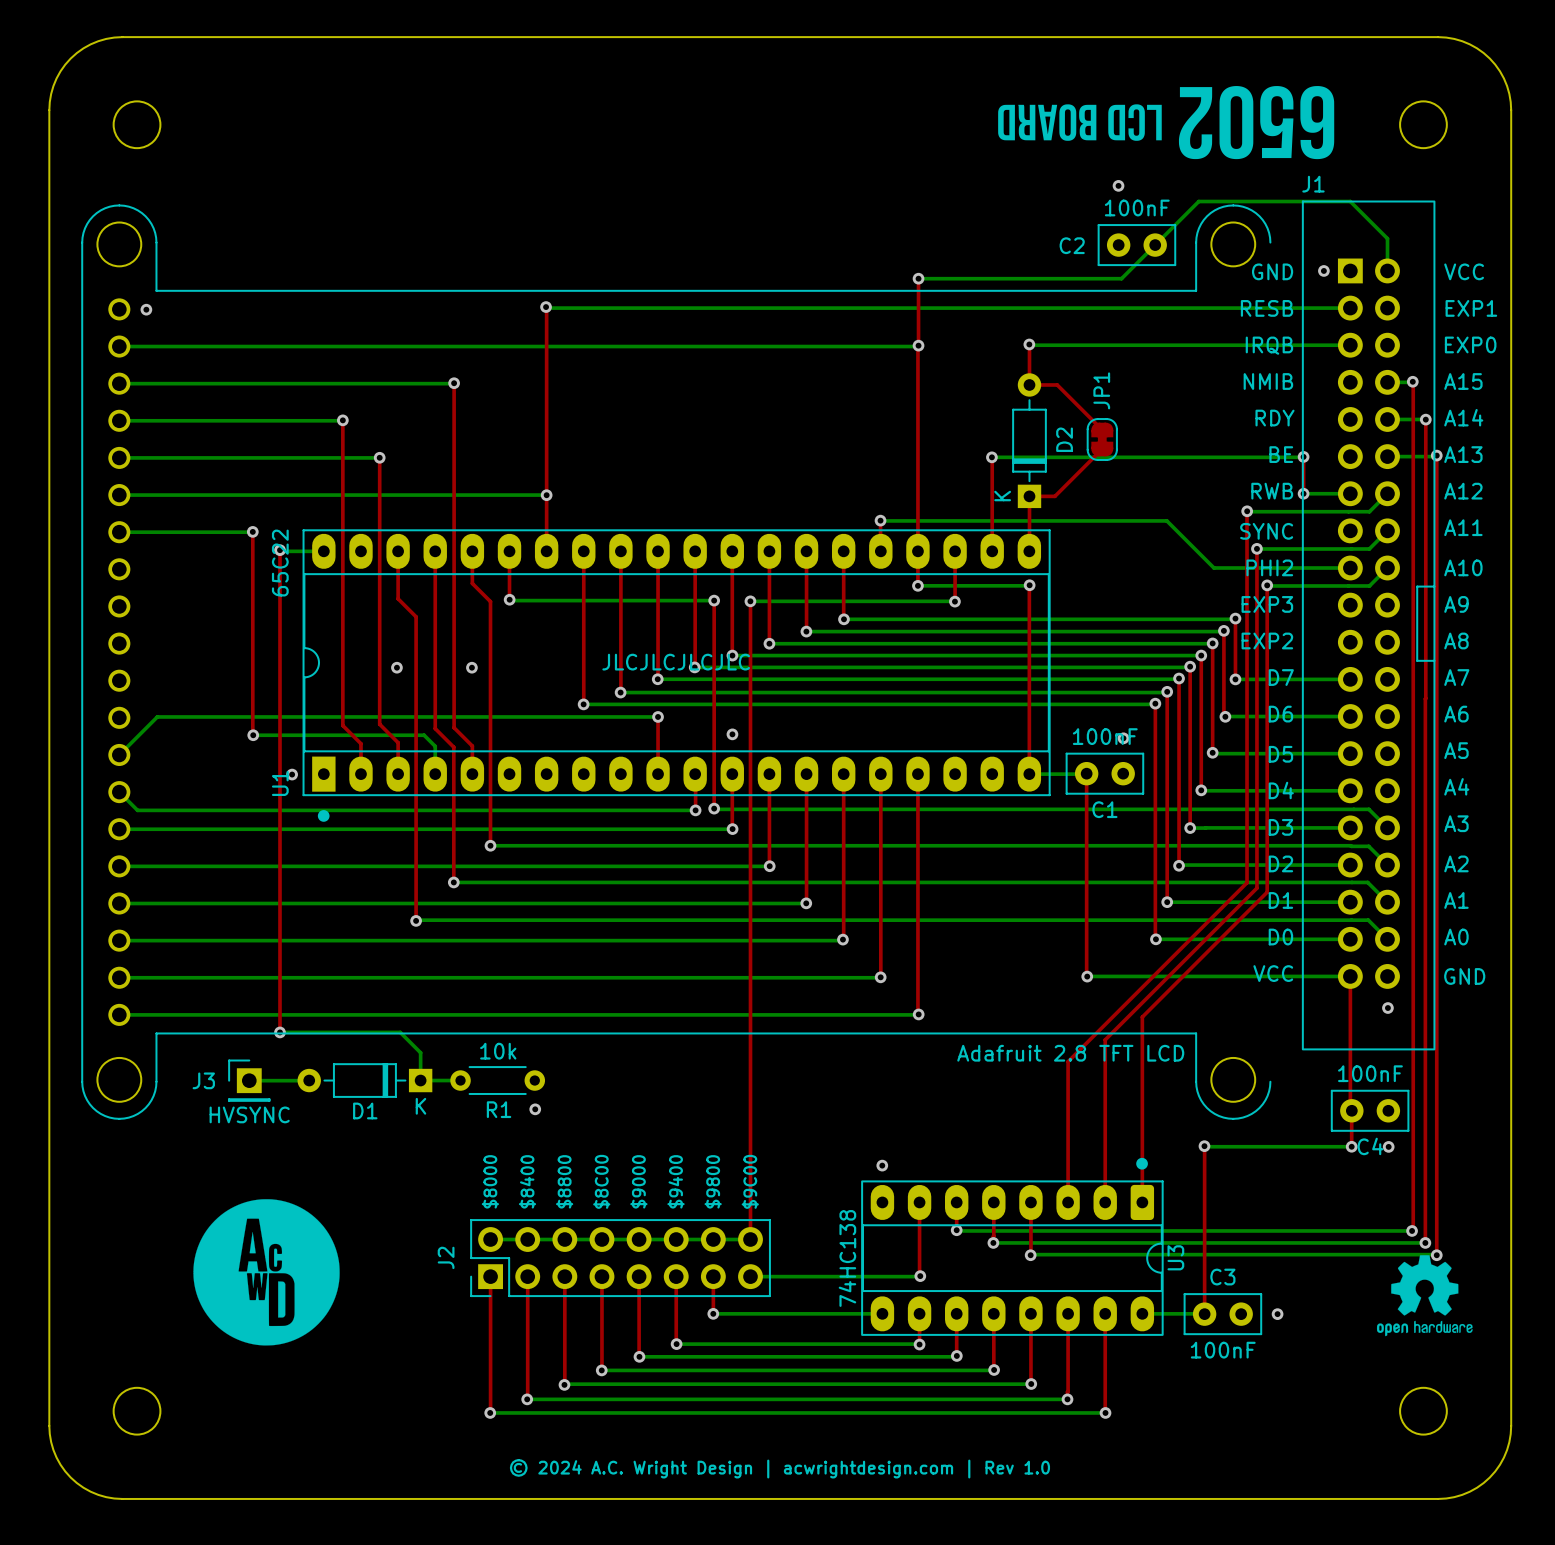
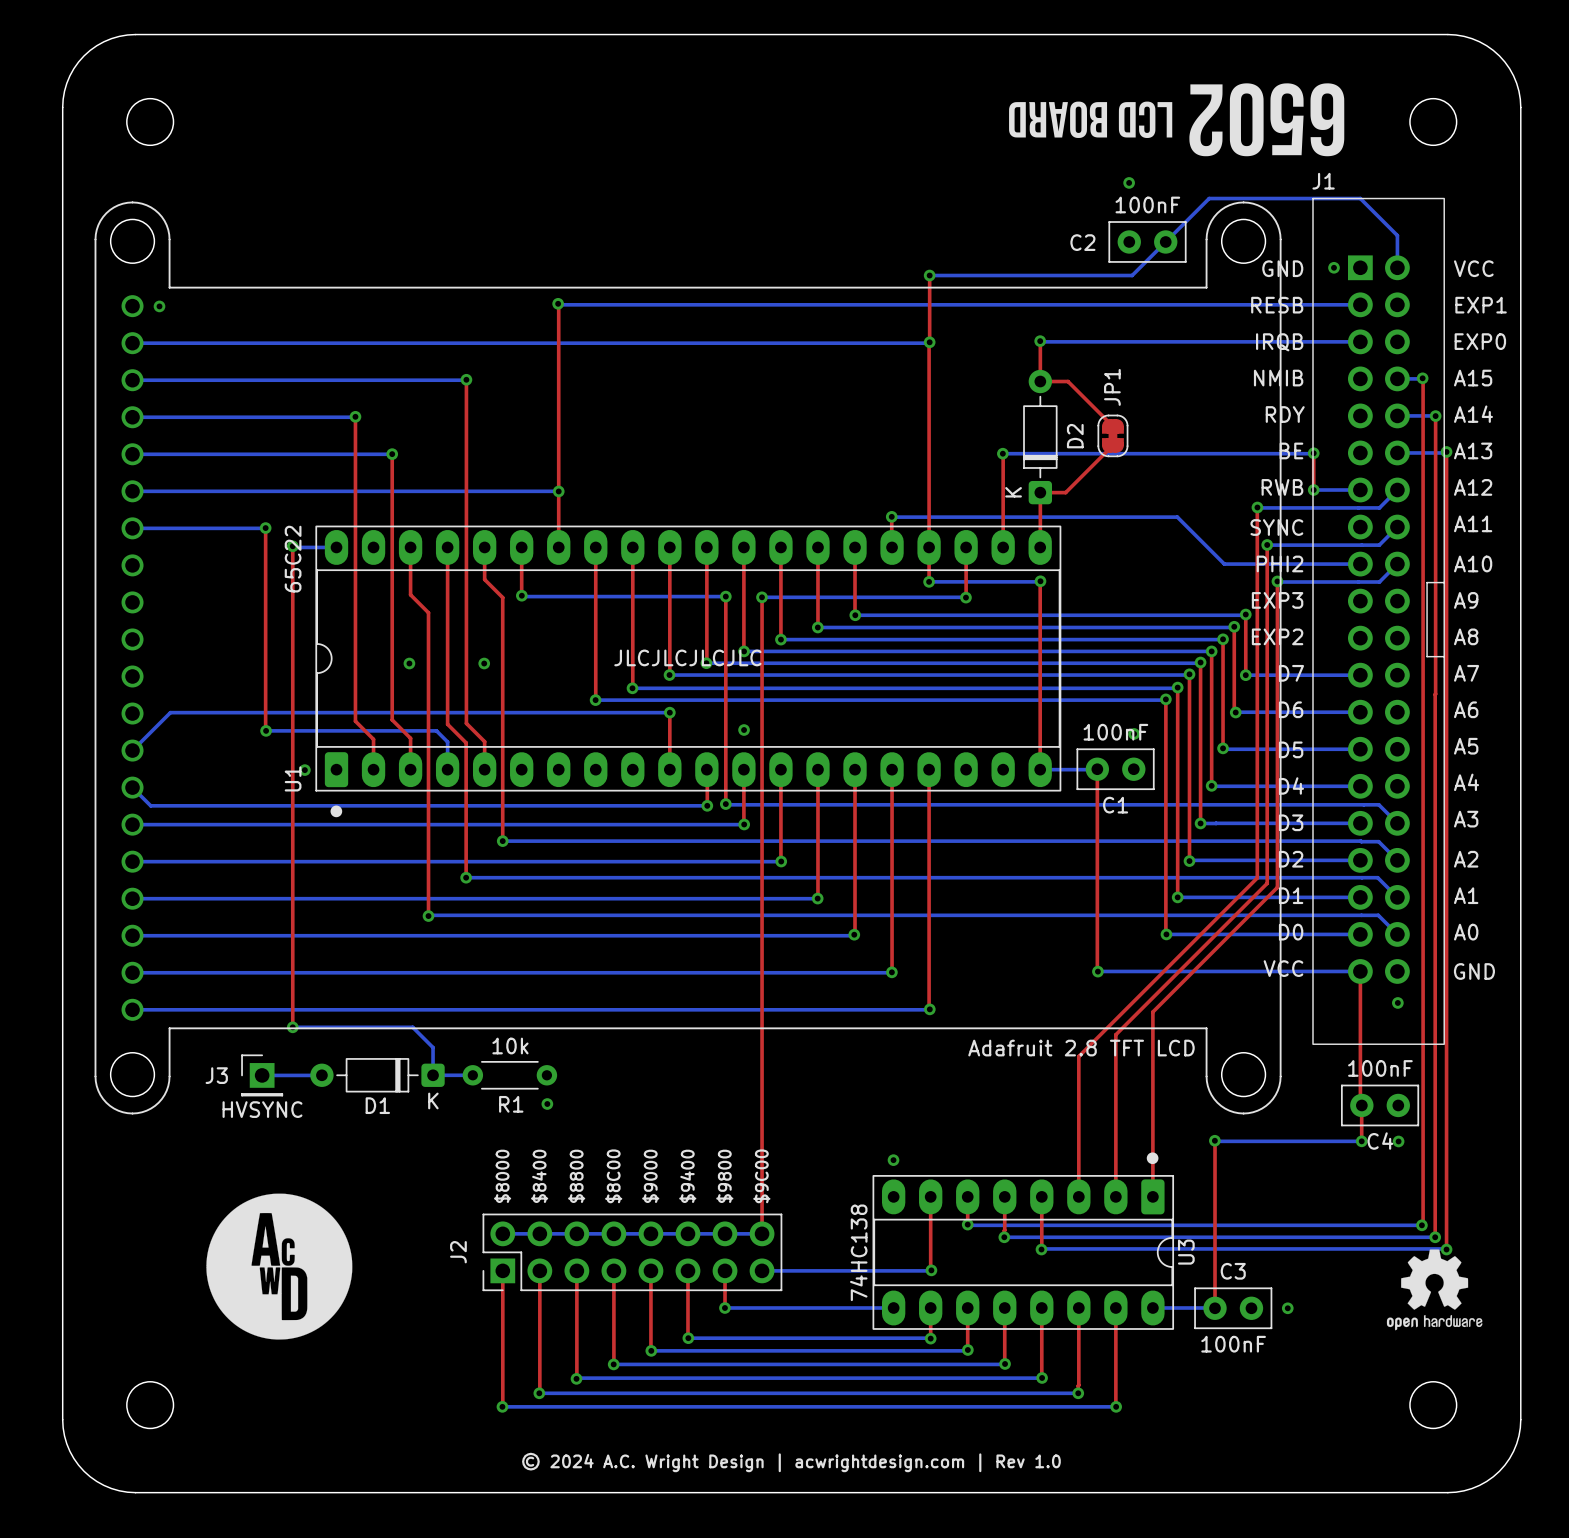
part footprint: [81, 204, 1272, 1120] -> [94, 201, 1282, 1115]
D2 footprint: [1012, 373, 1047, 509] -> [1023, 369, 1058, 505]
U1 footprint: [302, 529, 1051, 797] -> [315, 525, 1062, 792]
D1 footprint: [297, 1063, 433, 1098] -> [310, 1058, 445, 1093]

